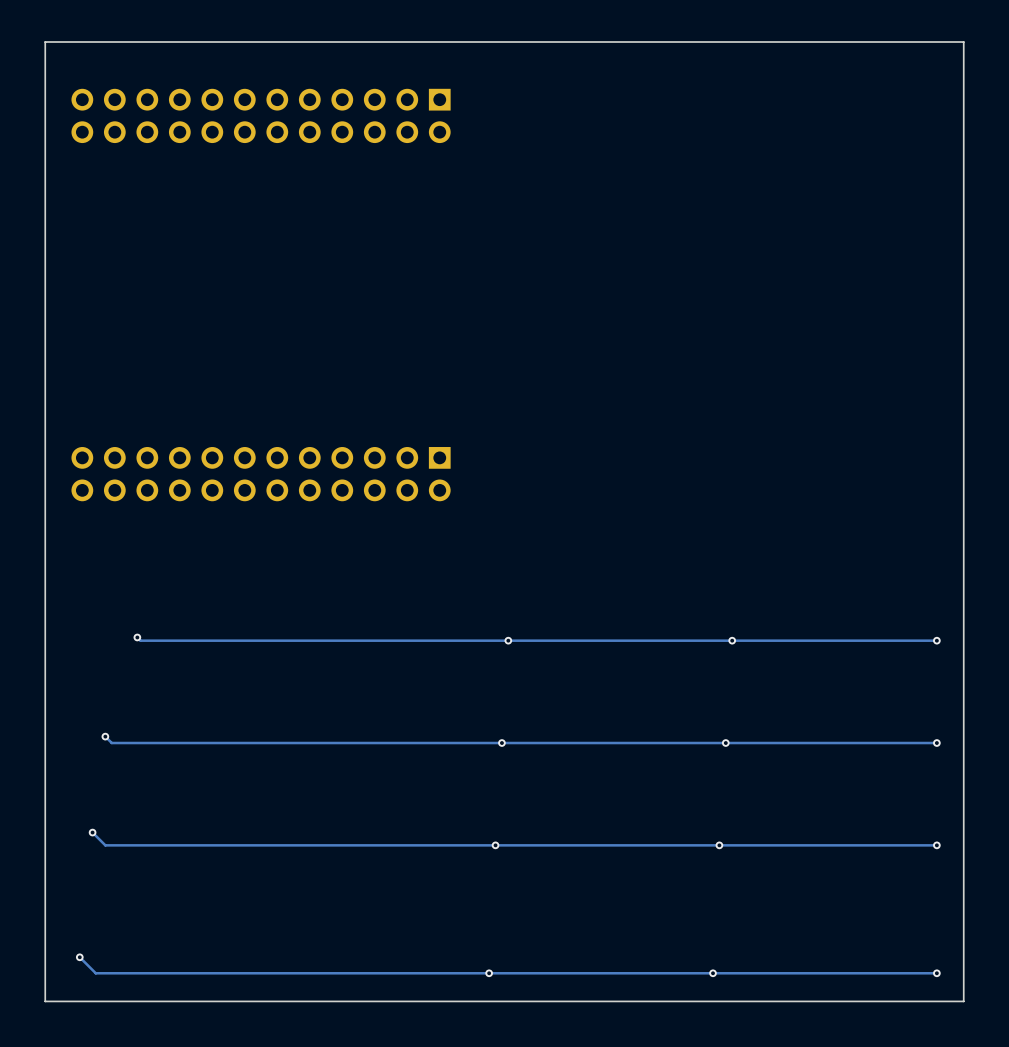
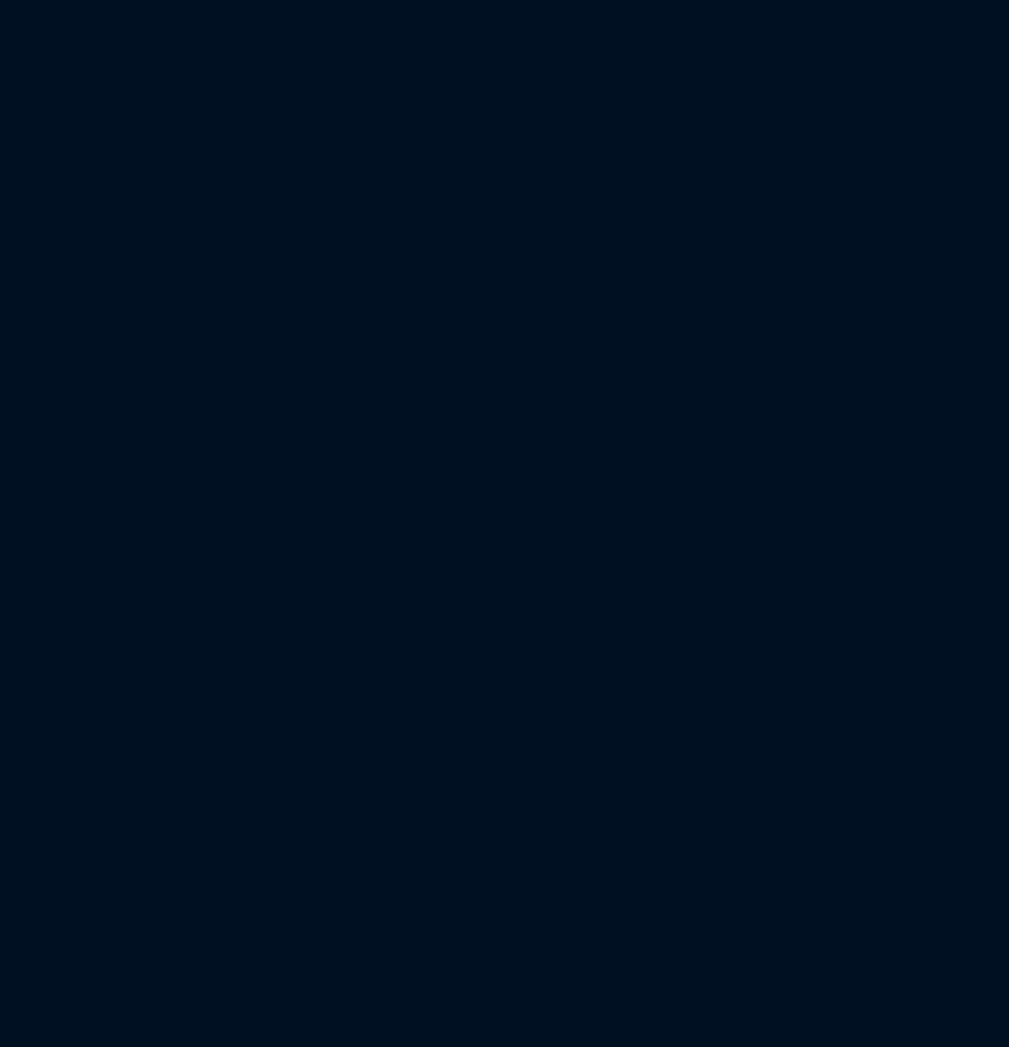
board edge: (963, 42) (45, 42) (45, 1001) (963, 1001) (963, 42) -> none
part: (261, 115) -> none
part: (261, 474) -> none
track: (137, 637) (140, 640) (936, 640) -> none
via: (137, 637) -> none
via: (508, 640) -> none
via: (732, 640) -> none
via: (936, 640) -> none
track: (105, 736) (111, 743) (936, 743) -> none
via: (105, 736) -> none
via: (501, 743) -> none
via: (725, 743) -> none
via: (936, 743) -> none
track: (92, 832) (105, 845) (936, 845) -> none
via: (92, 832) -> none
via: (495, 845) -> none
via: (719, 845) -> none
via: (936, 845) -> none
track: (79, 957) (95, 973) (936, 973) -> none
via: (79, 957) -> none
via: (489, 973) -> none
via: (713, 973) -> none
via: (936, 973) -> none

